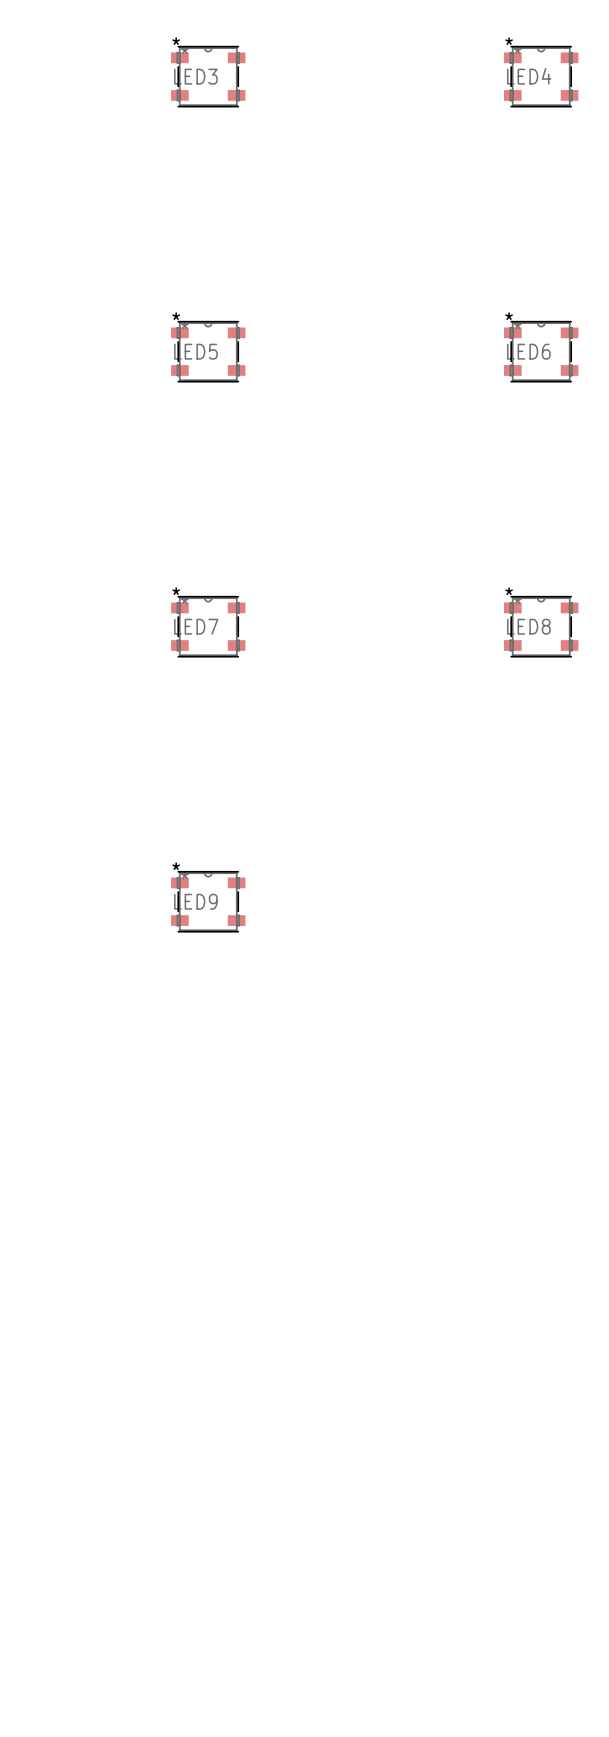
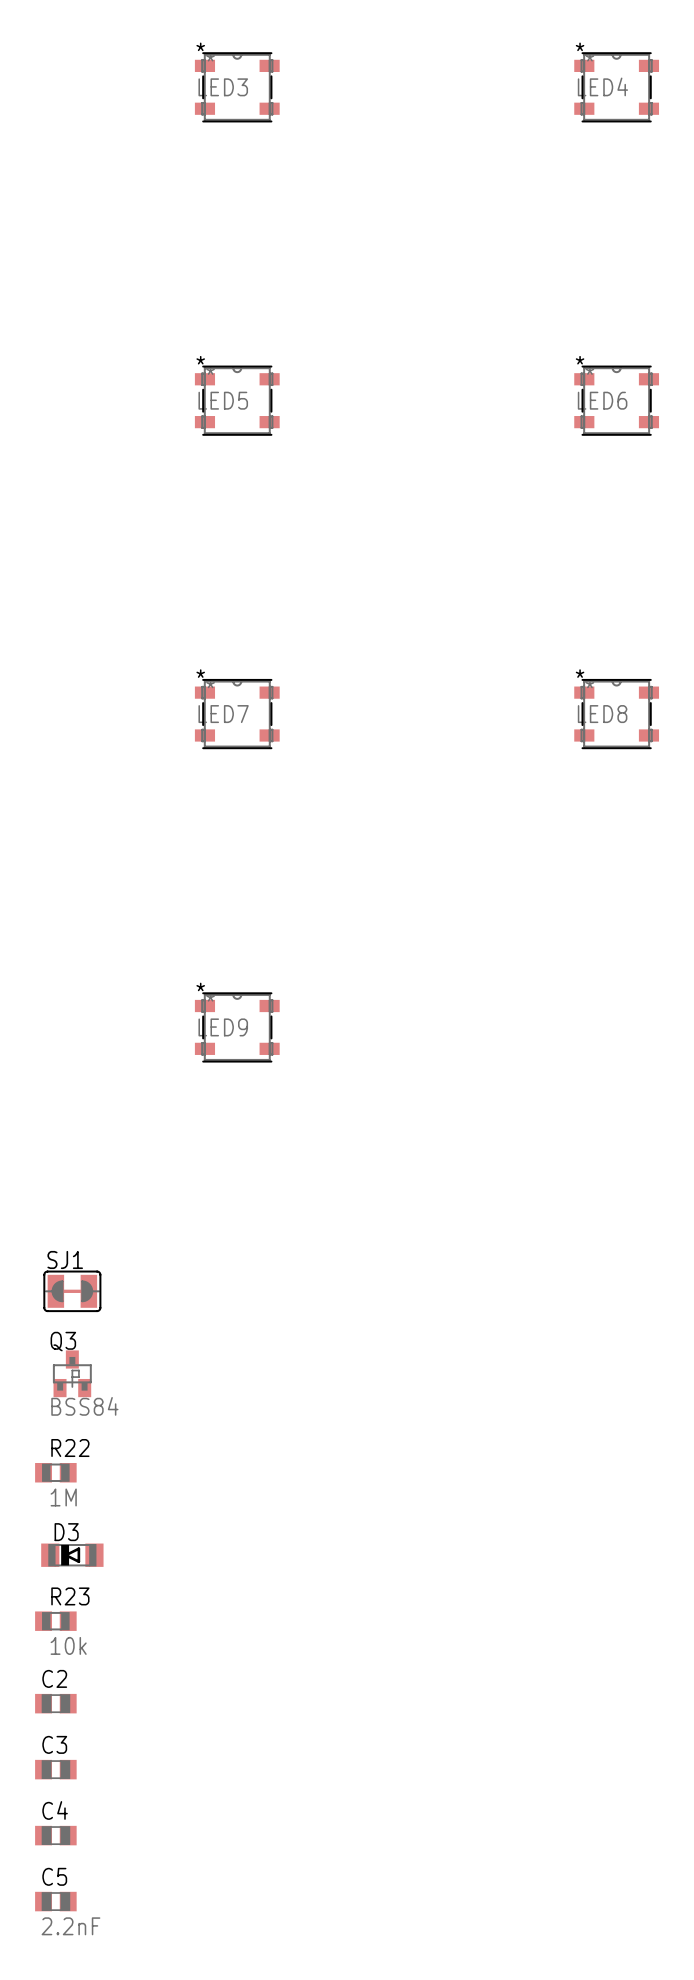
SJ1: none -> (72, 1291)
Q3: none -> BSS84 (72, 1373)
R22: none -> 1M (55, 1472)
D3: none -> (72, 1555)
R23: none -> 10k (55, 1621)
C2: none -> (55, 1703)
C3: none -> (55, 1769)
C4: none -> (55, 1835)
C5: none -> 2.2nF (55, 1901)

